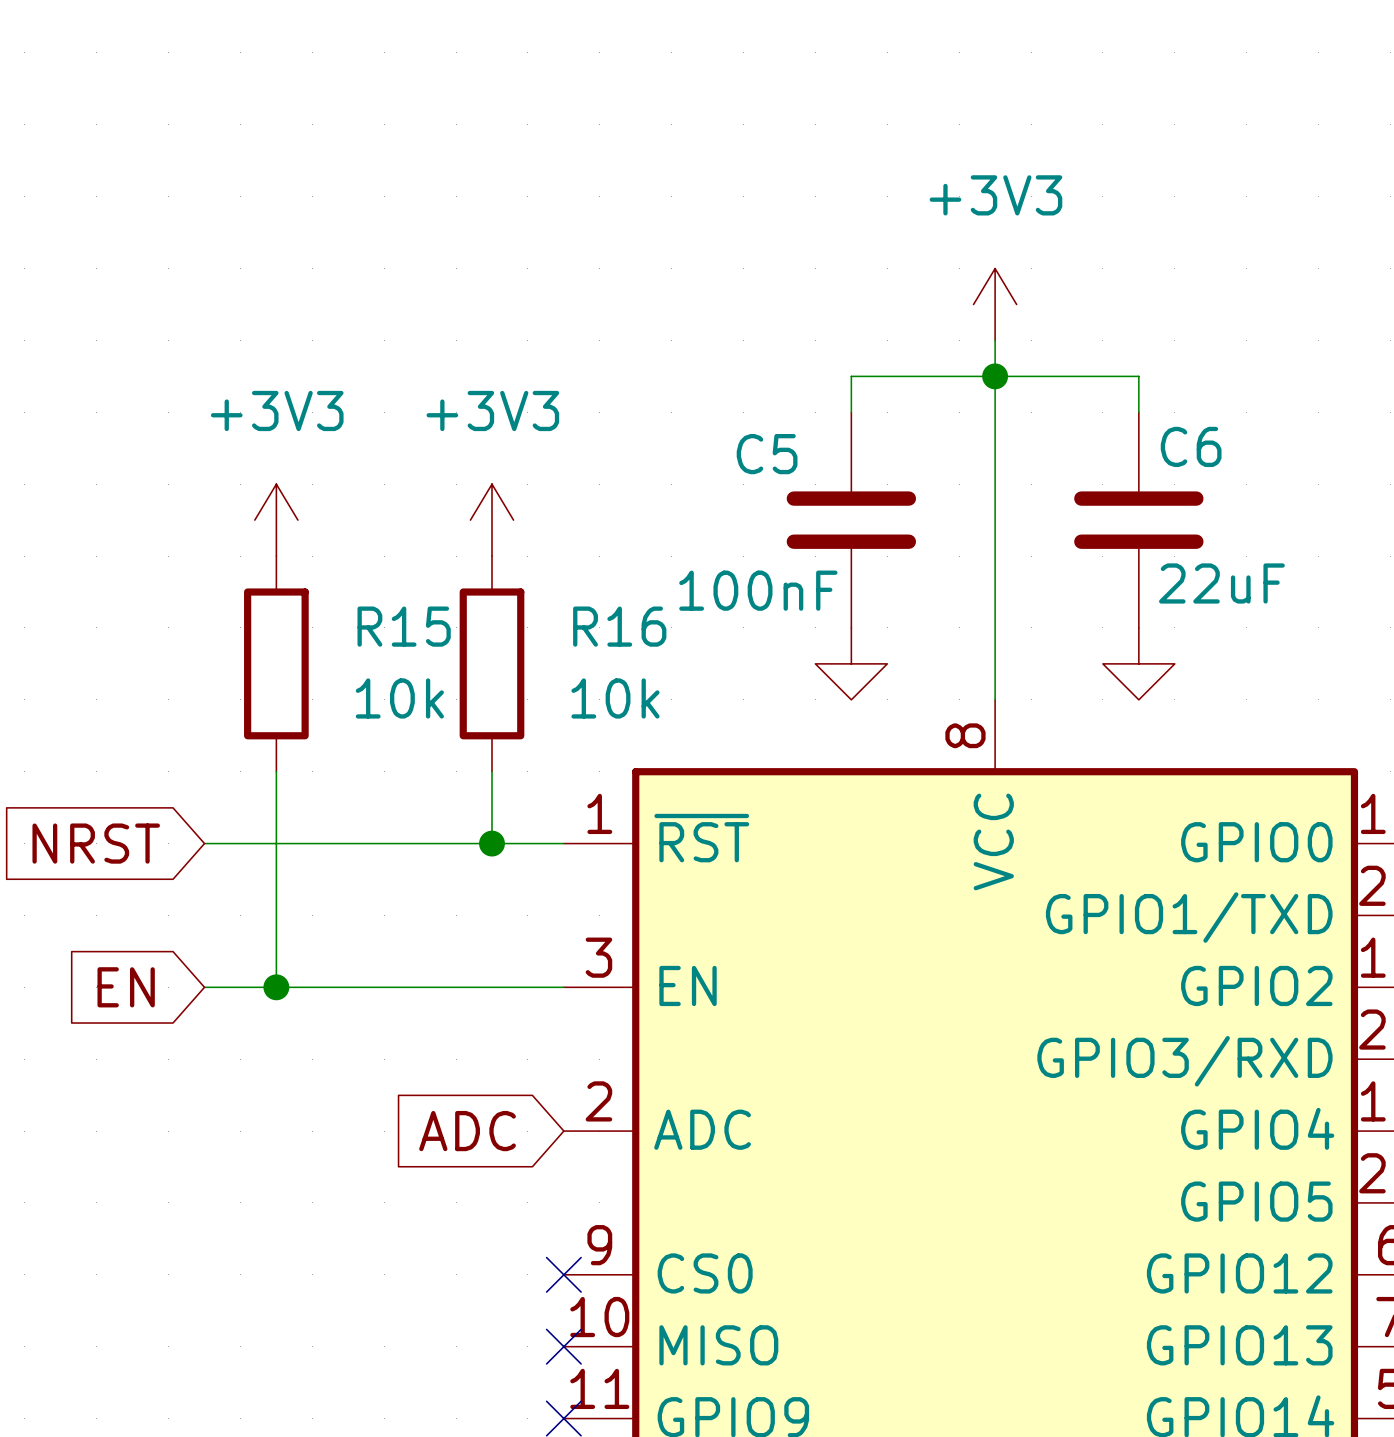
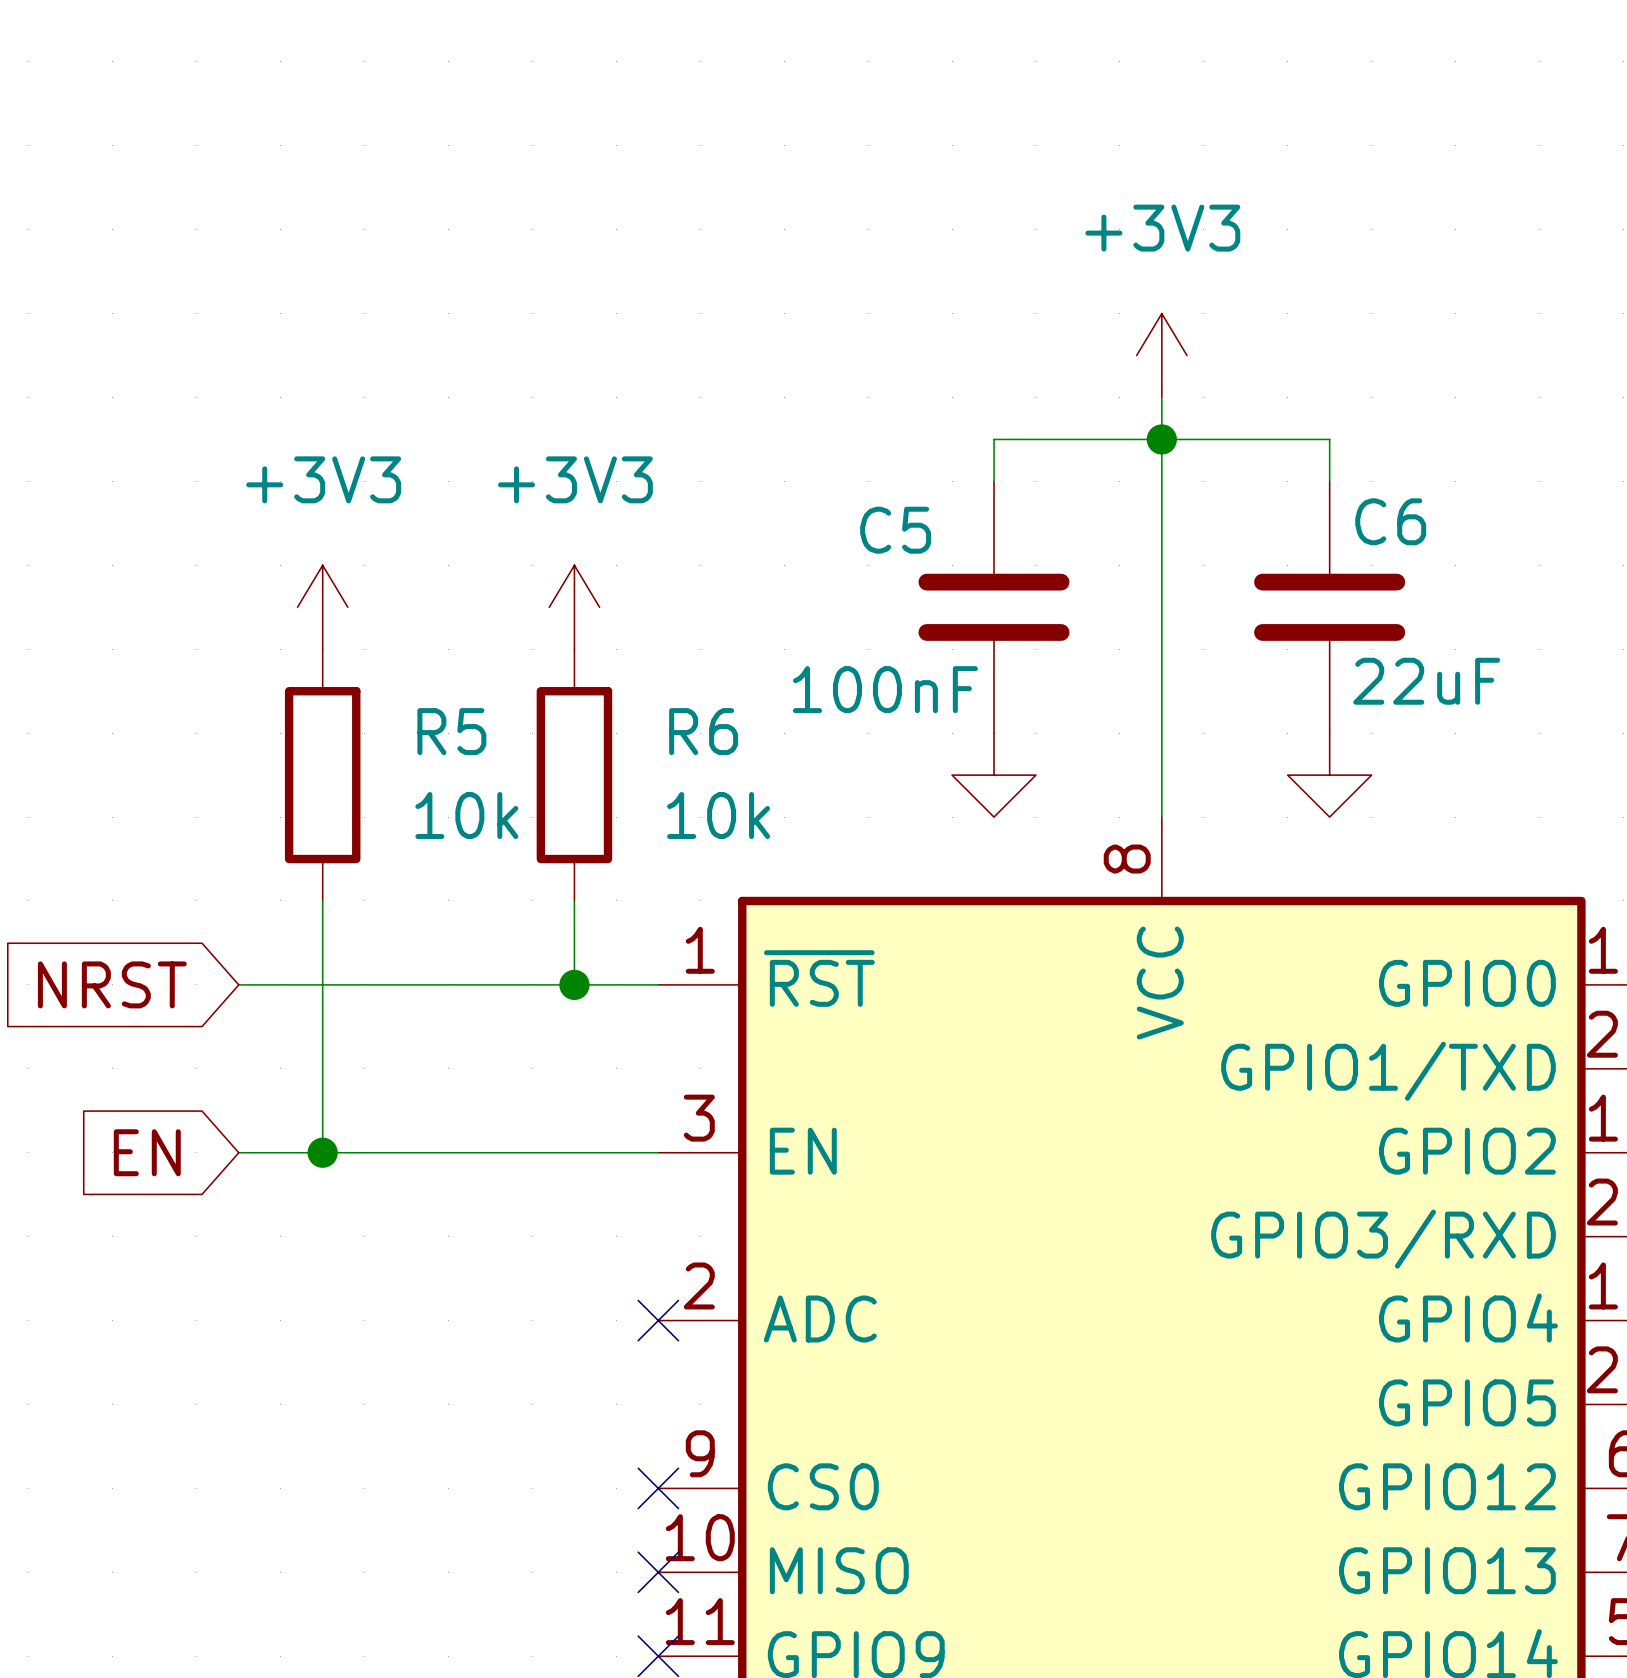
R15 name: R15 (404, 626) -> R5 (451, 731)
R16 name: R16 (619, 626) -> R6 (703, 731)
global label: ADC (467, 1131) -> none
no-connect mark: none -> (658, 1320)

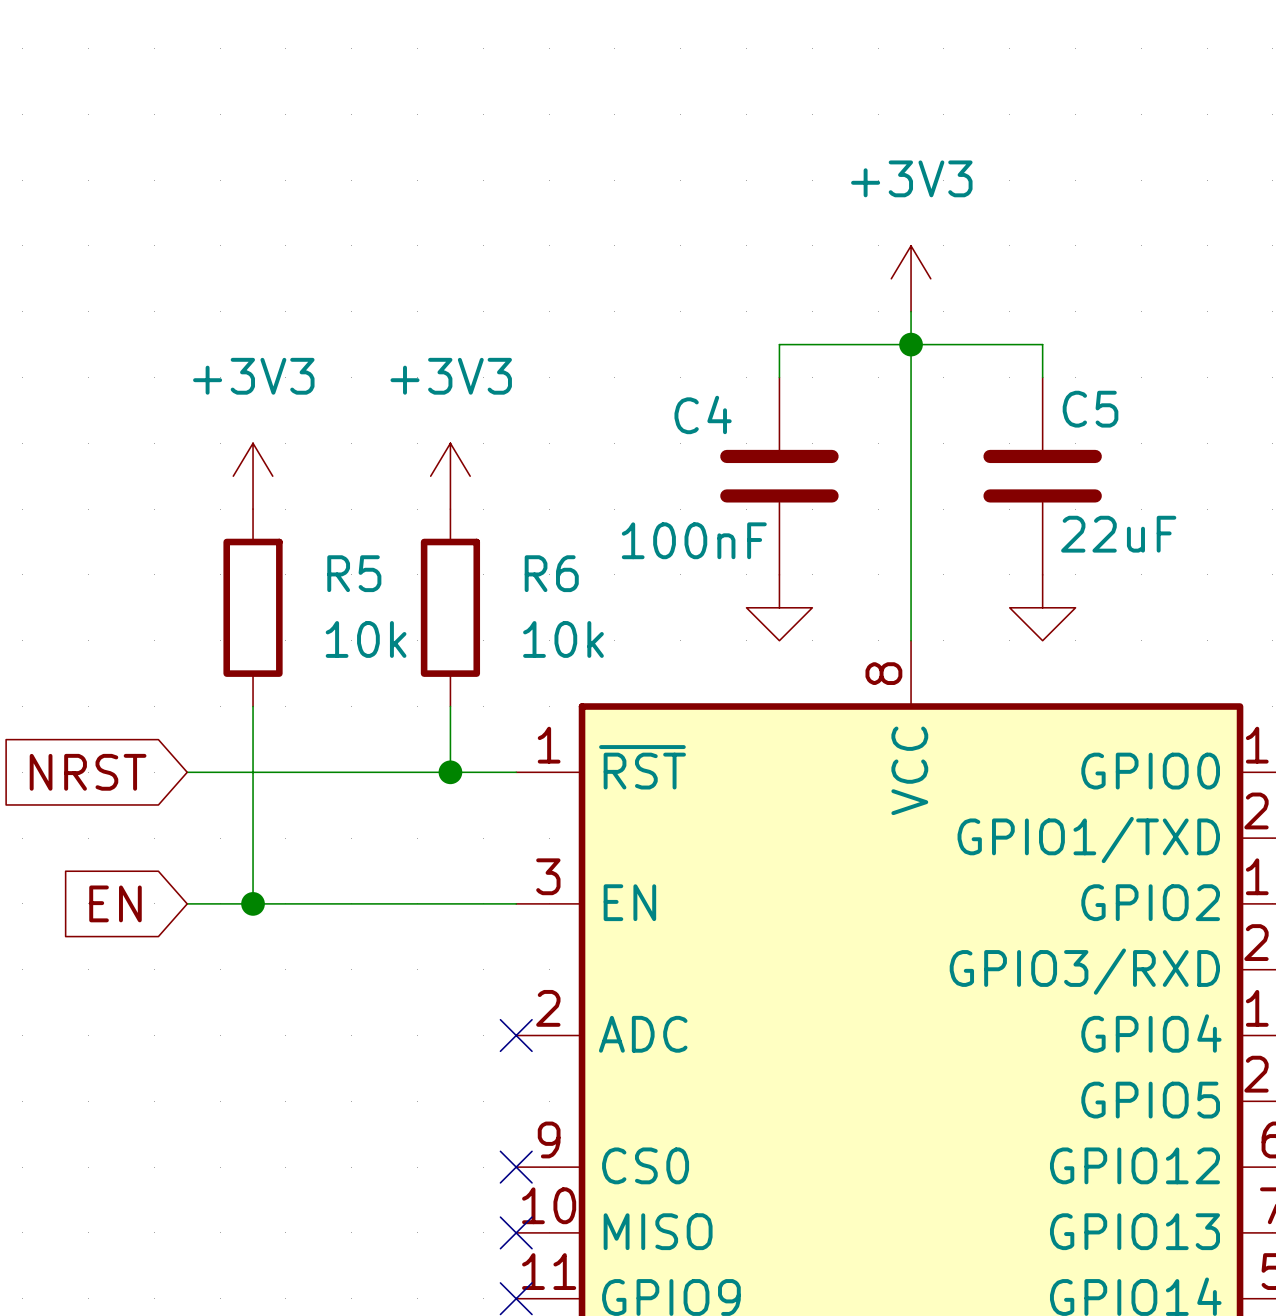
C6 name: C6 (1390, 521) -> C5 (1090, 409)
C5 name: C5 (895, 530) -> C4 (703, 414)

